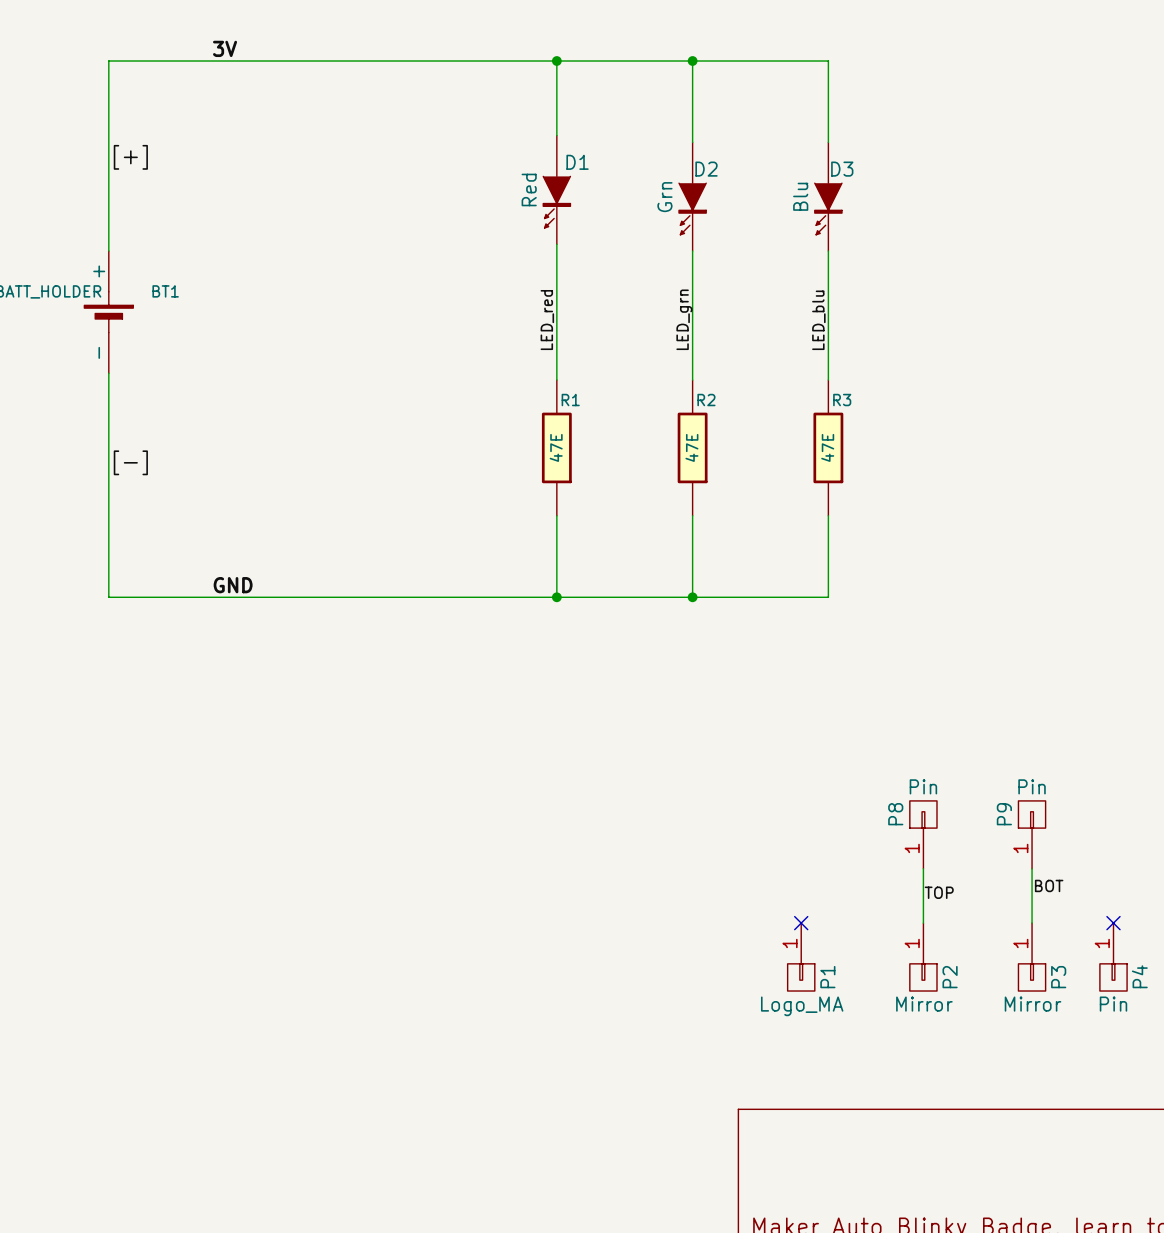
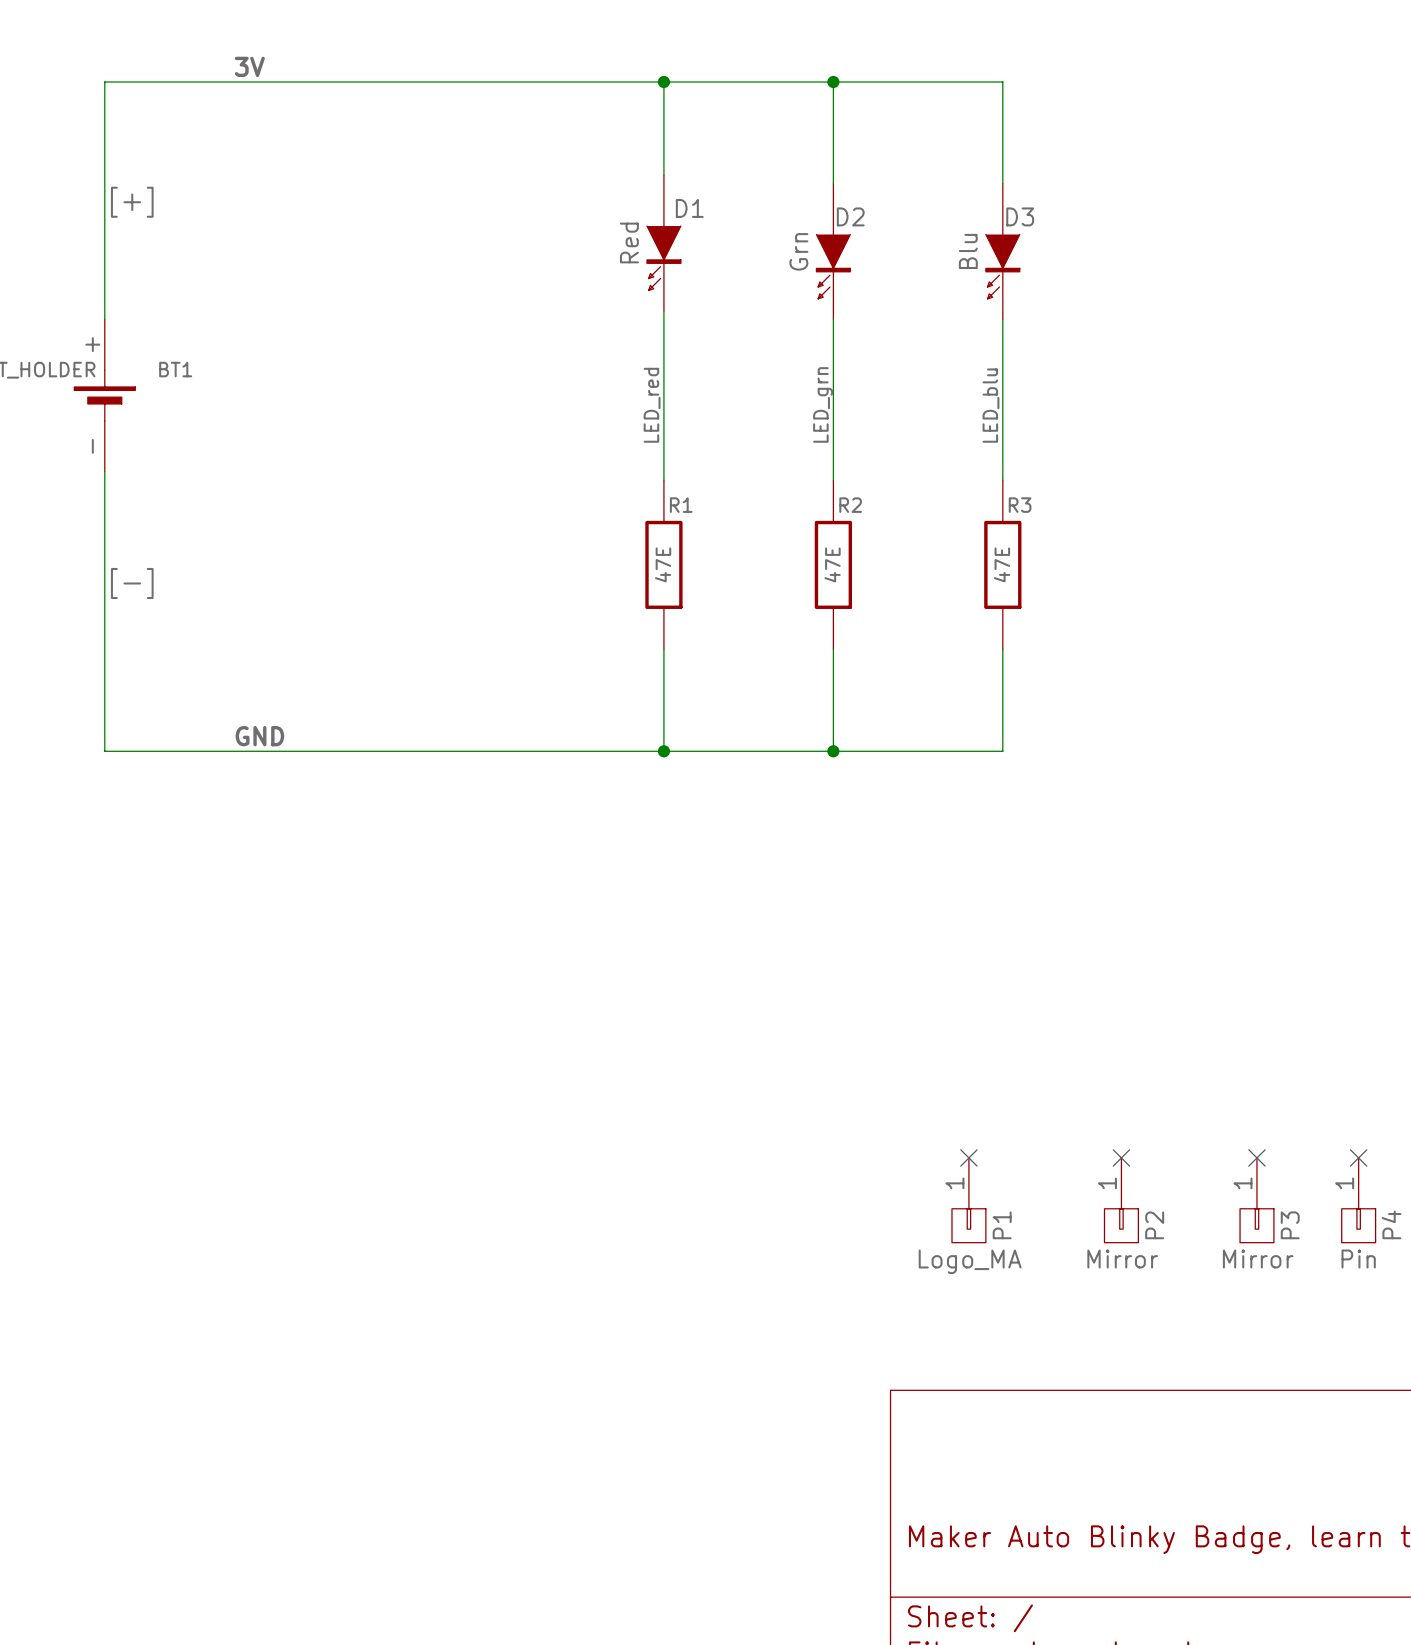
P8: Pin (923, 834) -> none
P9: Pin (1032, 834) -> none
wire: (923, 868) (923, 923) -> none
wire: (1032, 868) (1032, 923) -> none
label: BOT (1049, 885) -> none
label: TOP (939, 892) -> none
no-connect mark: none -> (1121, 1157)
no-connect mark: none -> (1256, 1157)

